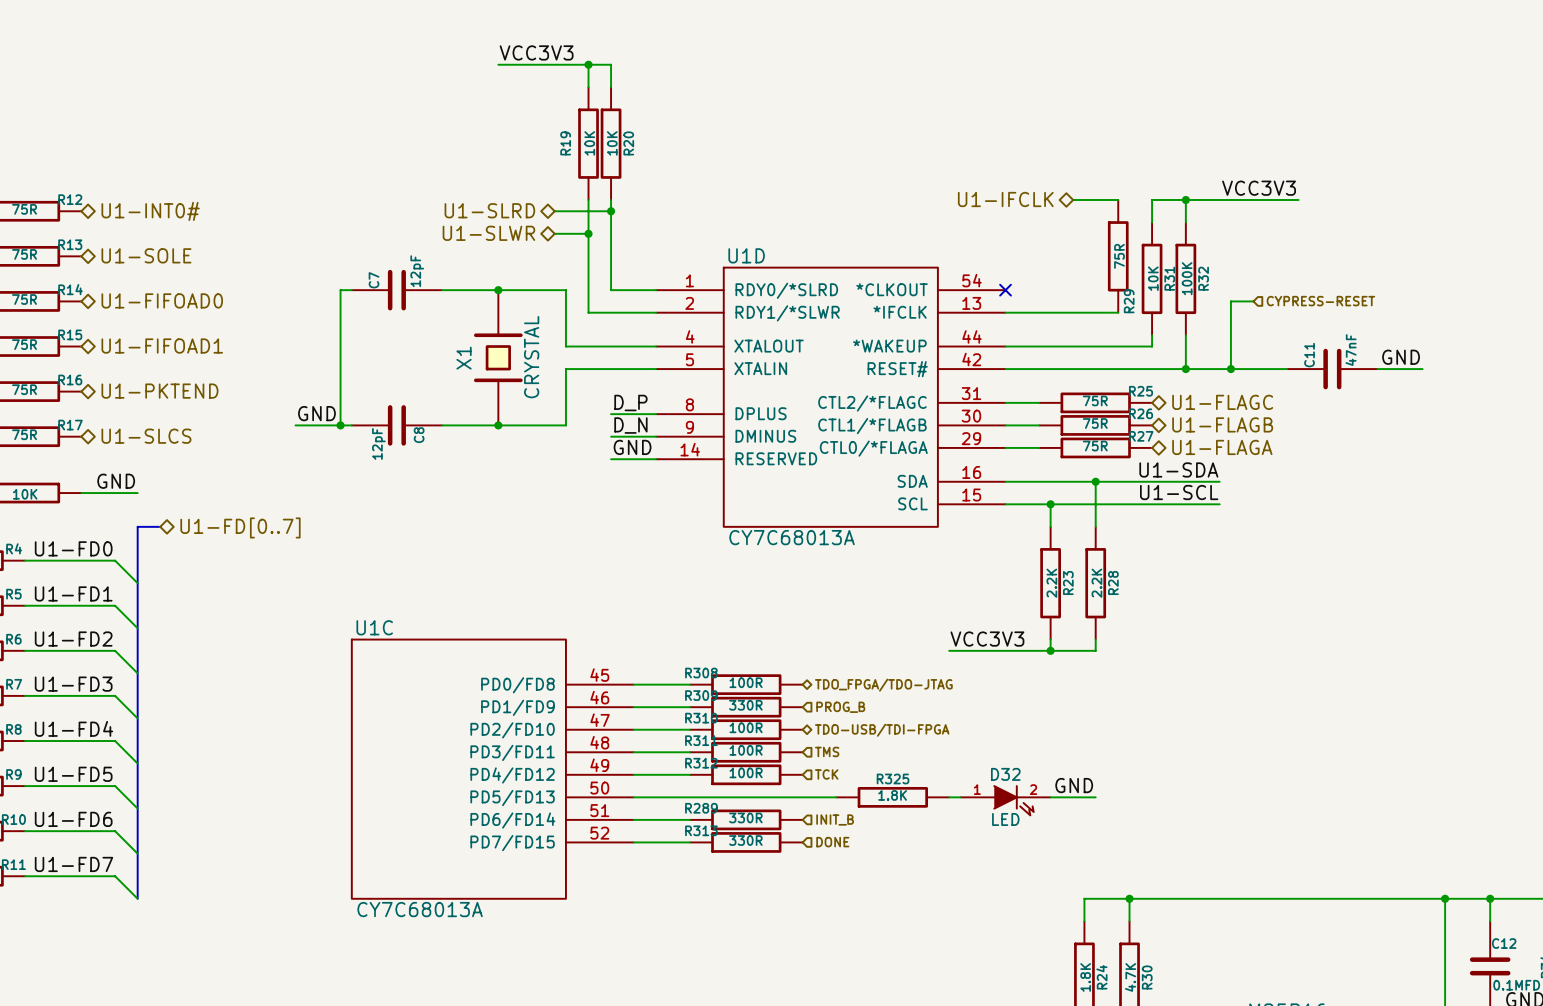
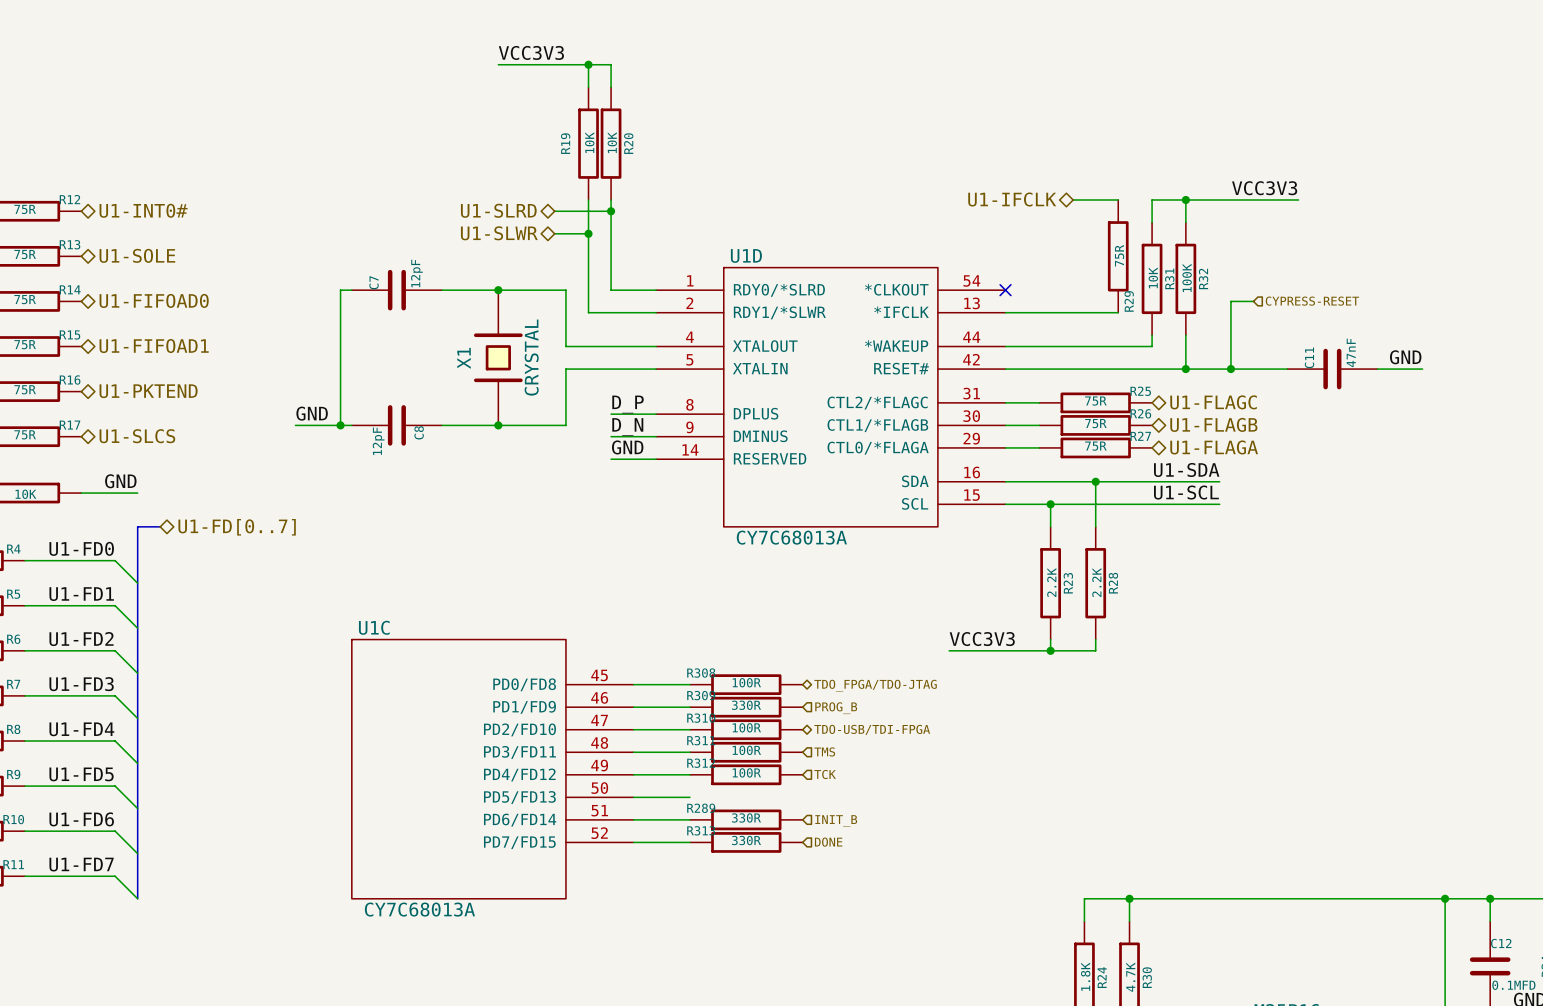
label: GND (1074, 785) -> none
wire: (689, 797) (836, 797) -> none
R325: 1.8K (892, 797) -> none
wire: (949, 797) (960, 797) -> none
wire: (1050, 797) (1095, 797) -> none
D32: LED (1005, 800) -> none

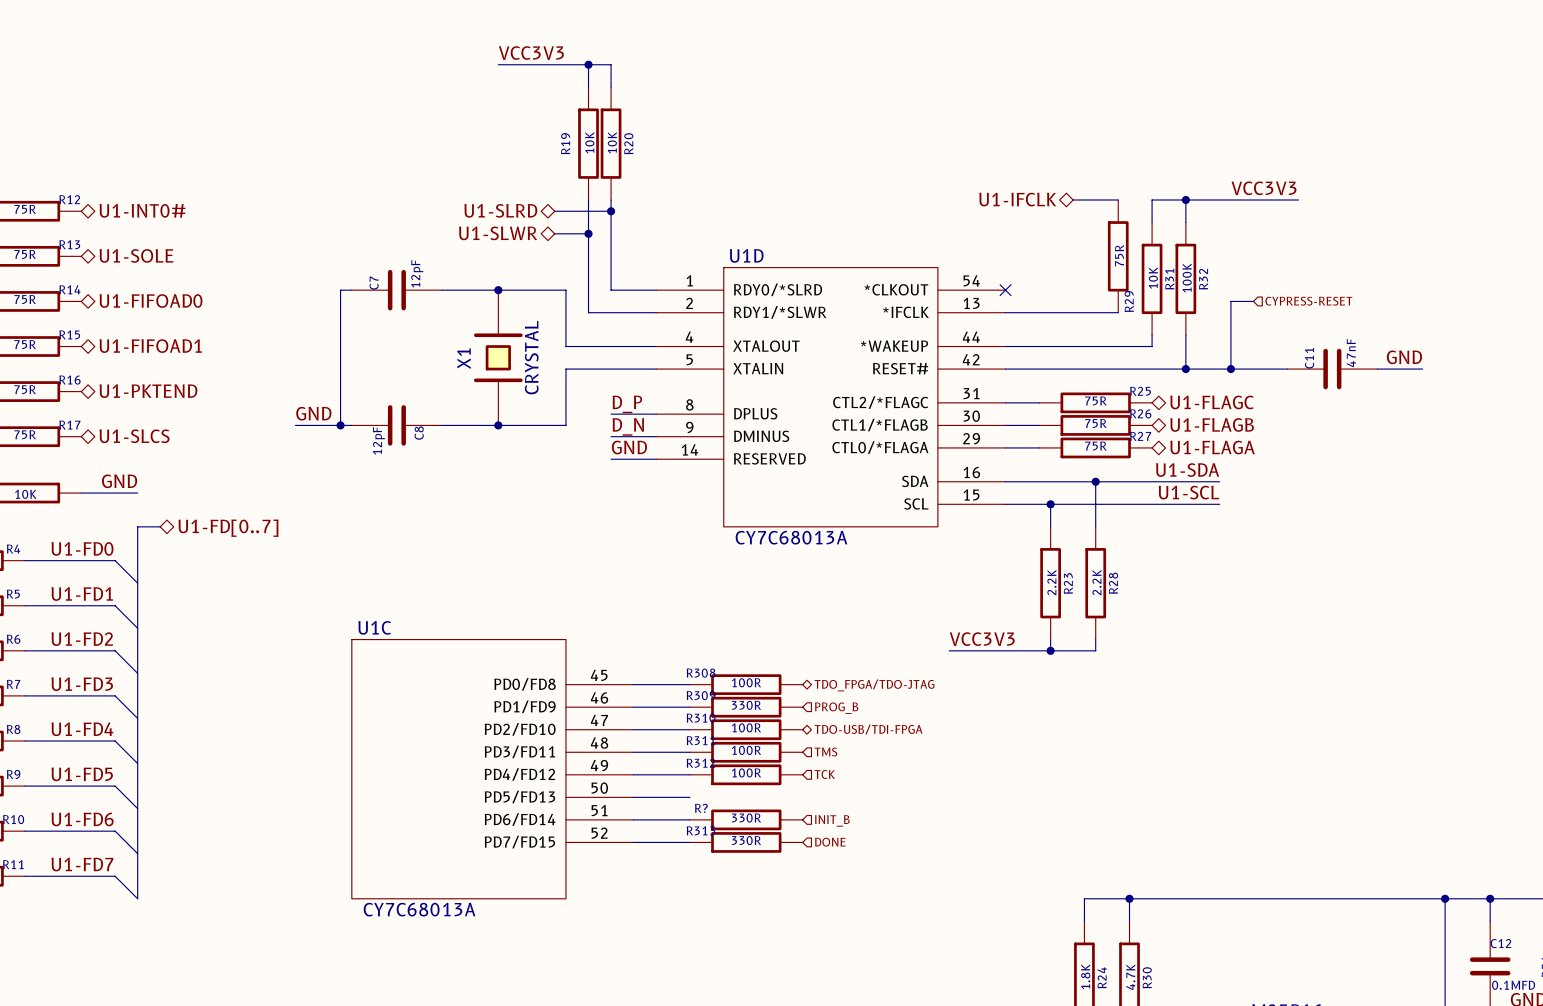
R289 name: R289 (701, 808) -> R? (701, 808)

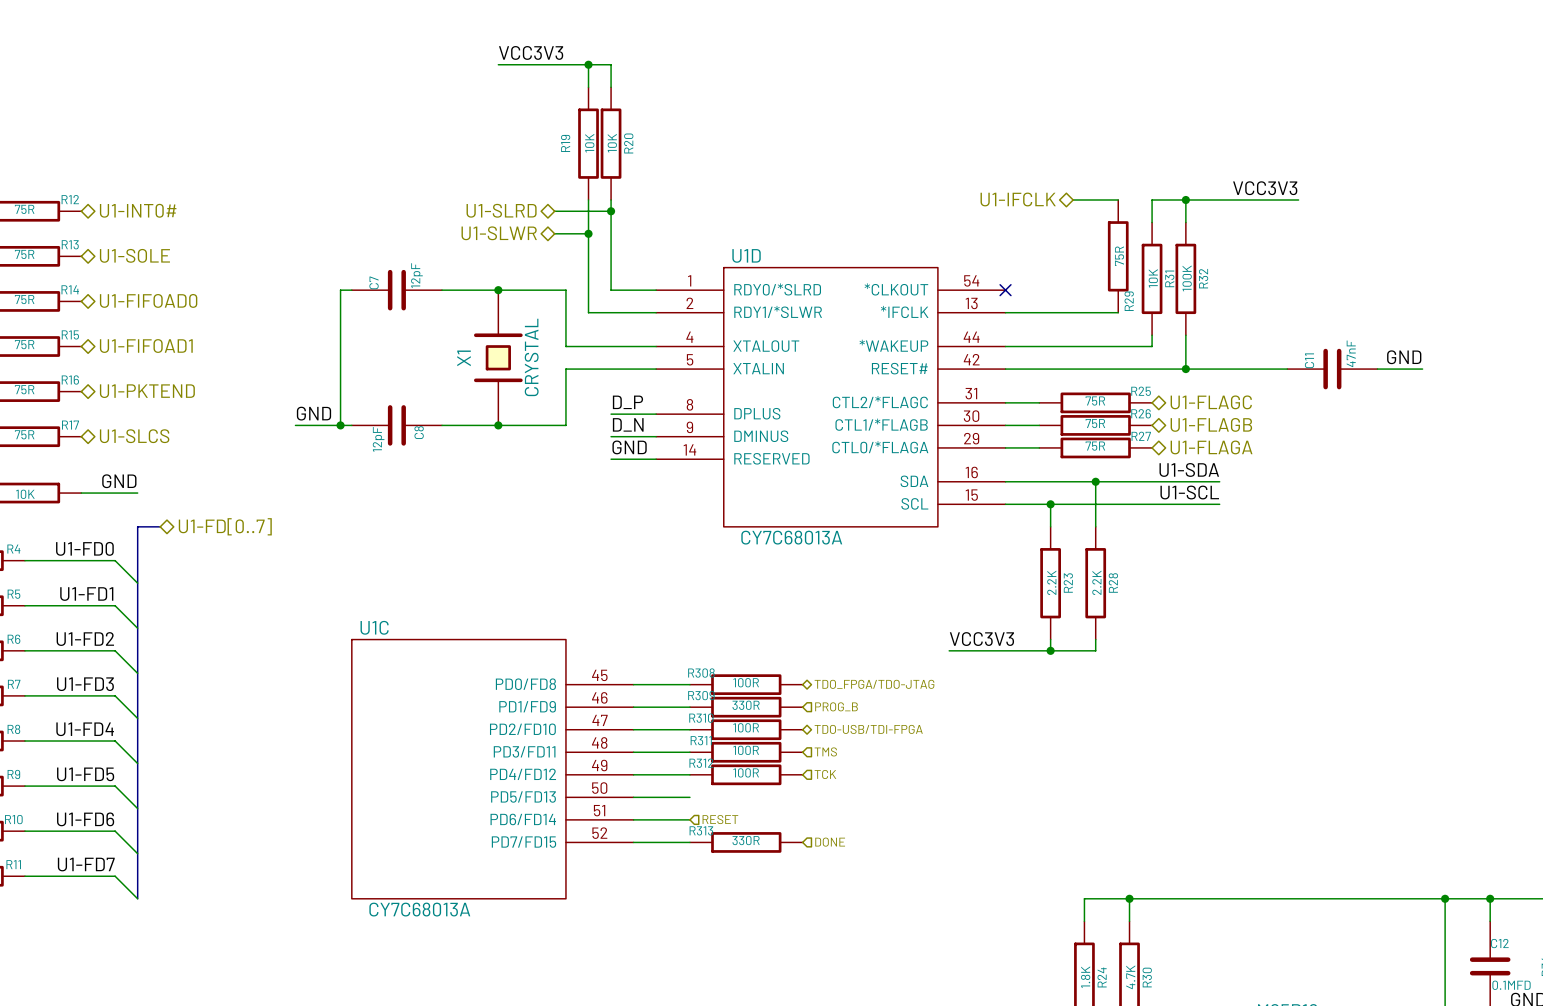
wire: (1253, 301) (1230, 301) (1230, 369) -> none
hierarchical label: CYPRESS-RESET (1308, 301) -> none
junction: (1230, 369) -> none
hierarchical label: none -> RESET (720, 819)
R?: 330R (746, 819) -> none
hierarchical label: INIT_B (832, 820) -> none

